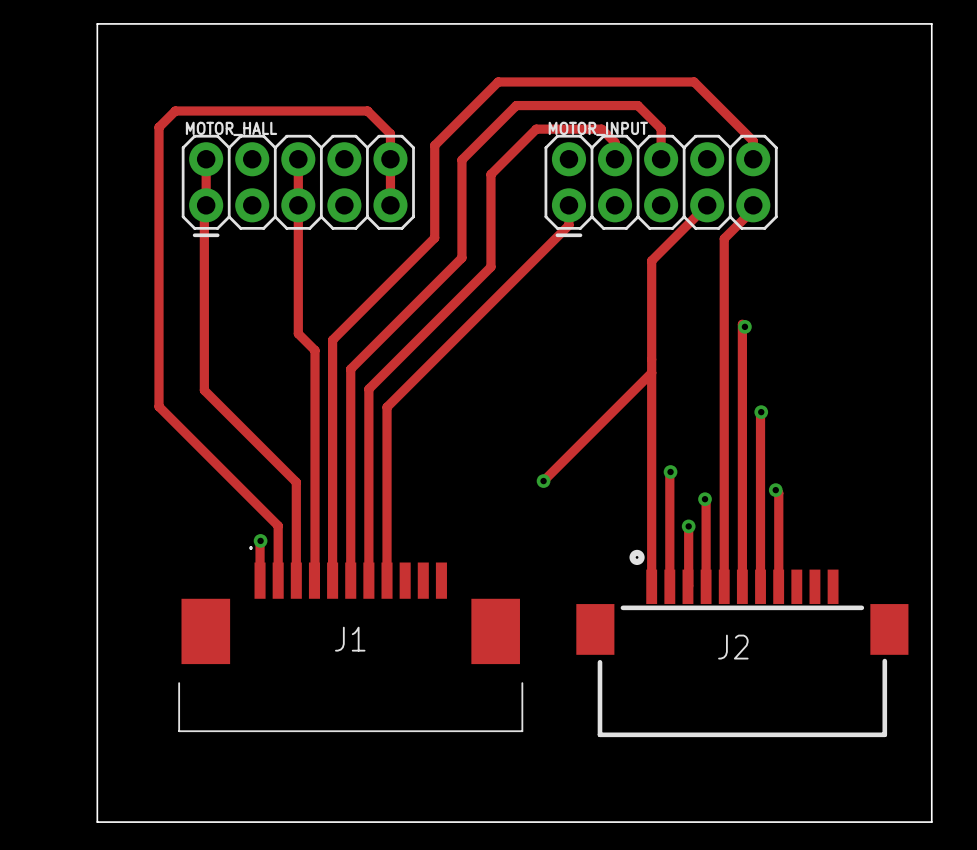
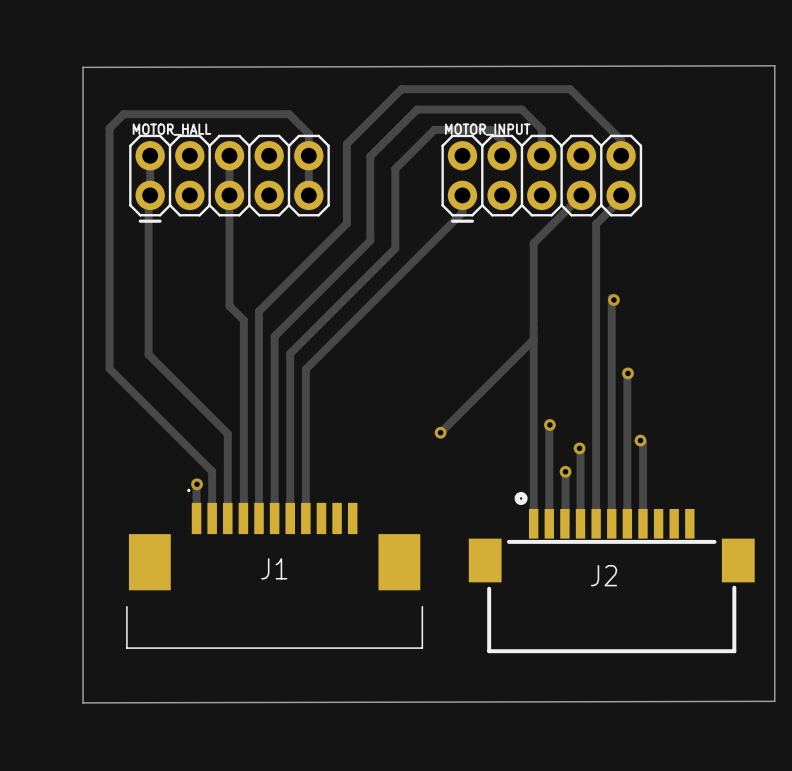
board edge: (931, 54) (931, 23) (97, 23) (97, 822) (931, 822) (931, 793) -> (774, 65) (83, 67) (83, 702) (774, 701)

